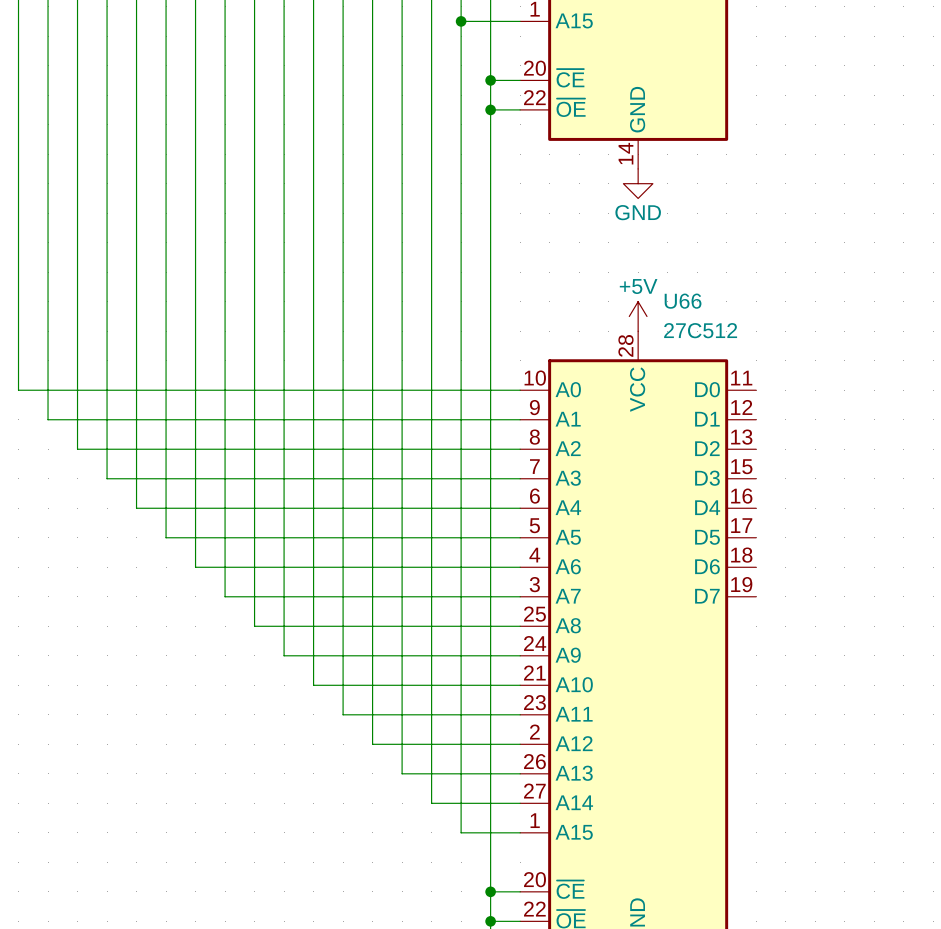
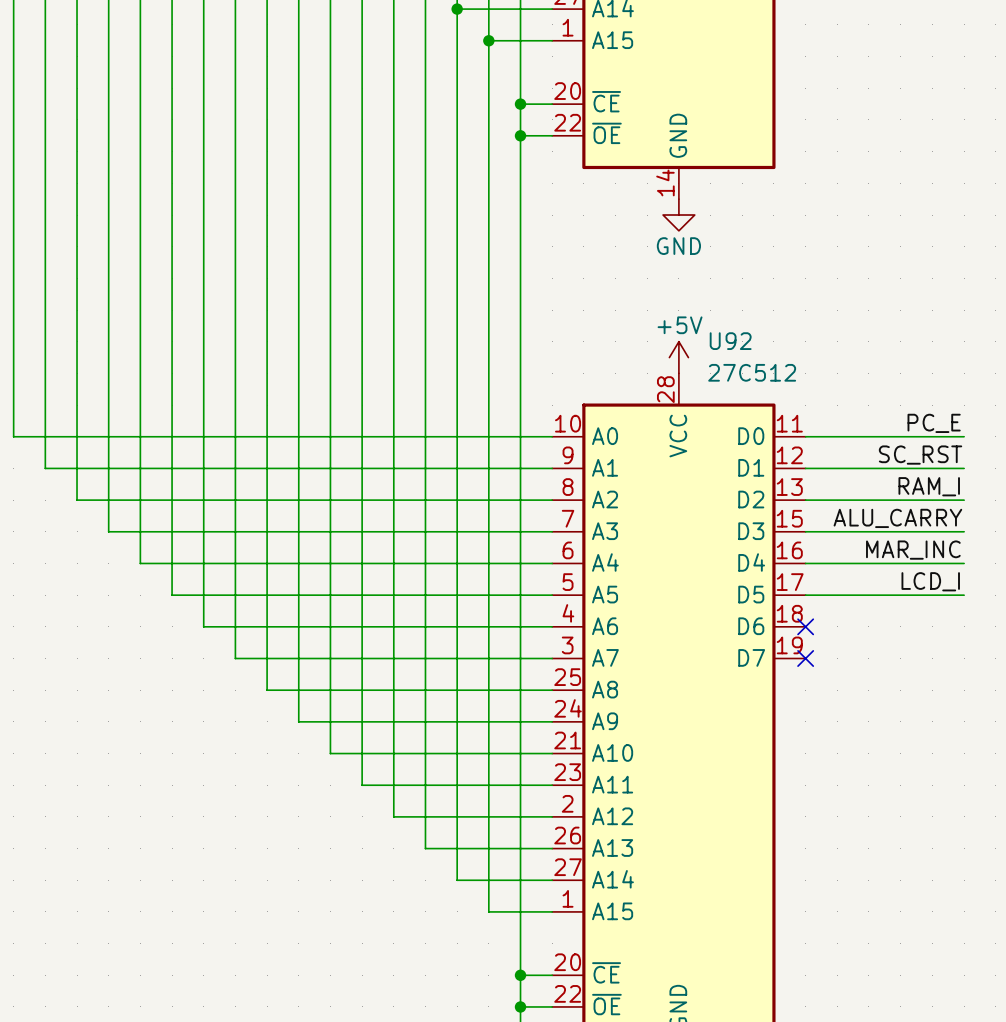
U66 name: U66 (683, 301) -> U92 (730, 341)
label: none -> PC_E (934, 423)
wire: none -> (805, 436) (964, 436)
label: none -> SC_RST (920, 455)
wire: none -> (805, 468) (964, 468)
label: none -> RAM_I (929, 486)
wire: none -> (805, 500) (964, 500)
label: none -> ALU_CARRY (897, 518)
wire: none -> (805, 531) (964, 531)
label: none -> MAR_INC (913, 550)
wire: none -> (805, 563) (964, 563)
label: none -> LCD_I (930, 581)
wire: none -> (805, 595) (964, 595)
no-connect mark: none -> (805, 626)
no-connect mark: none -> (805, 658)

